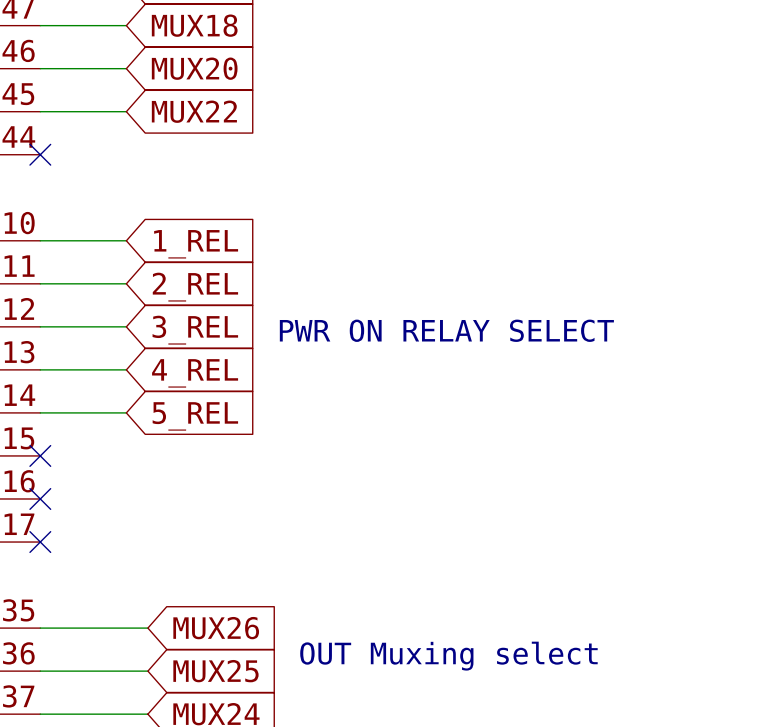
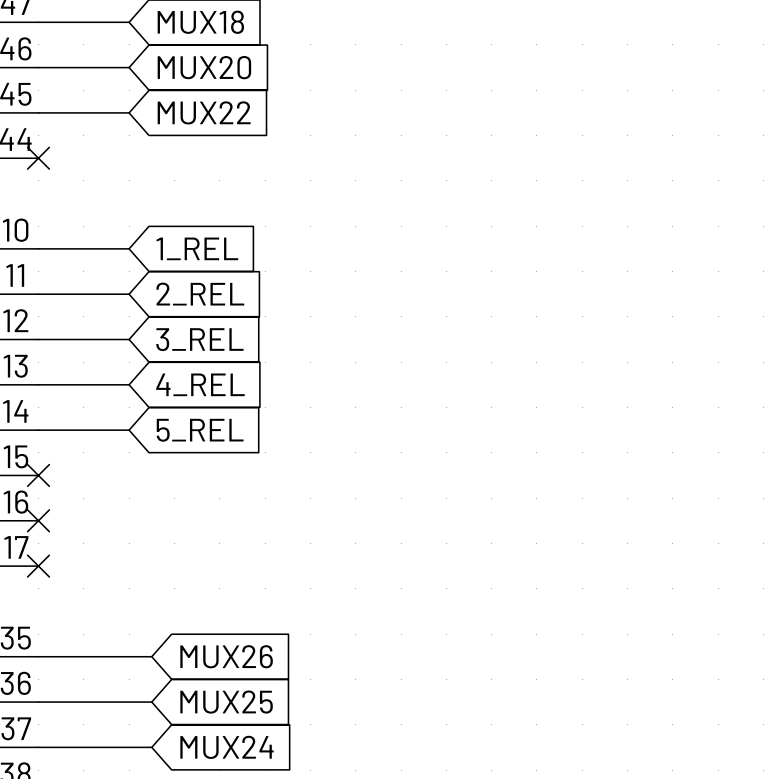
text: PWR ON RELAY SELECT (446, 330) -> none
text: OUT Muxing select (448, 656) -> none

